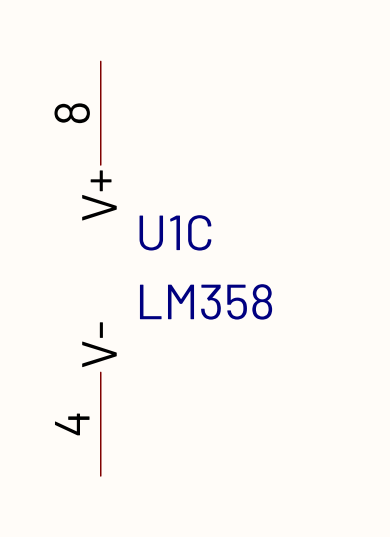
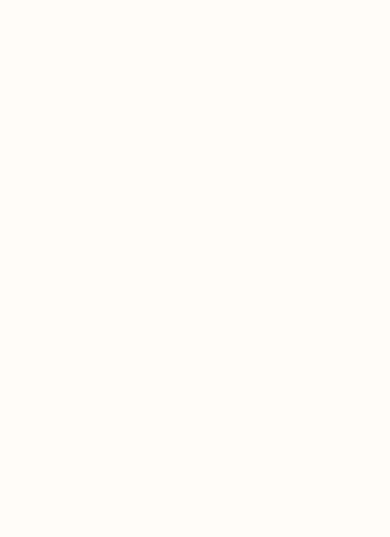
U1C: LM358 (100, 268) -> none

